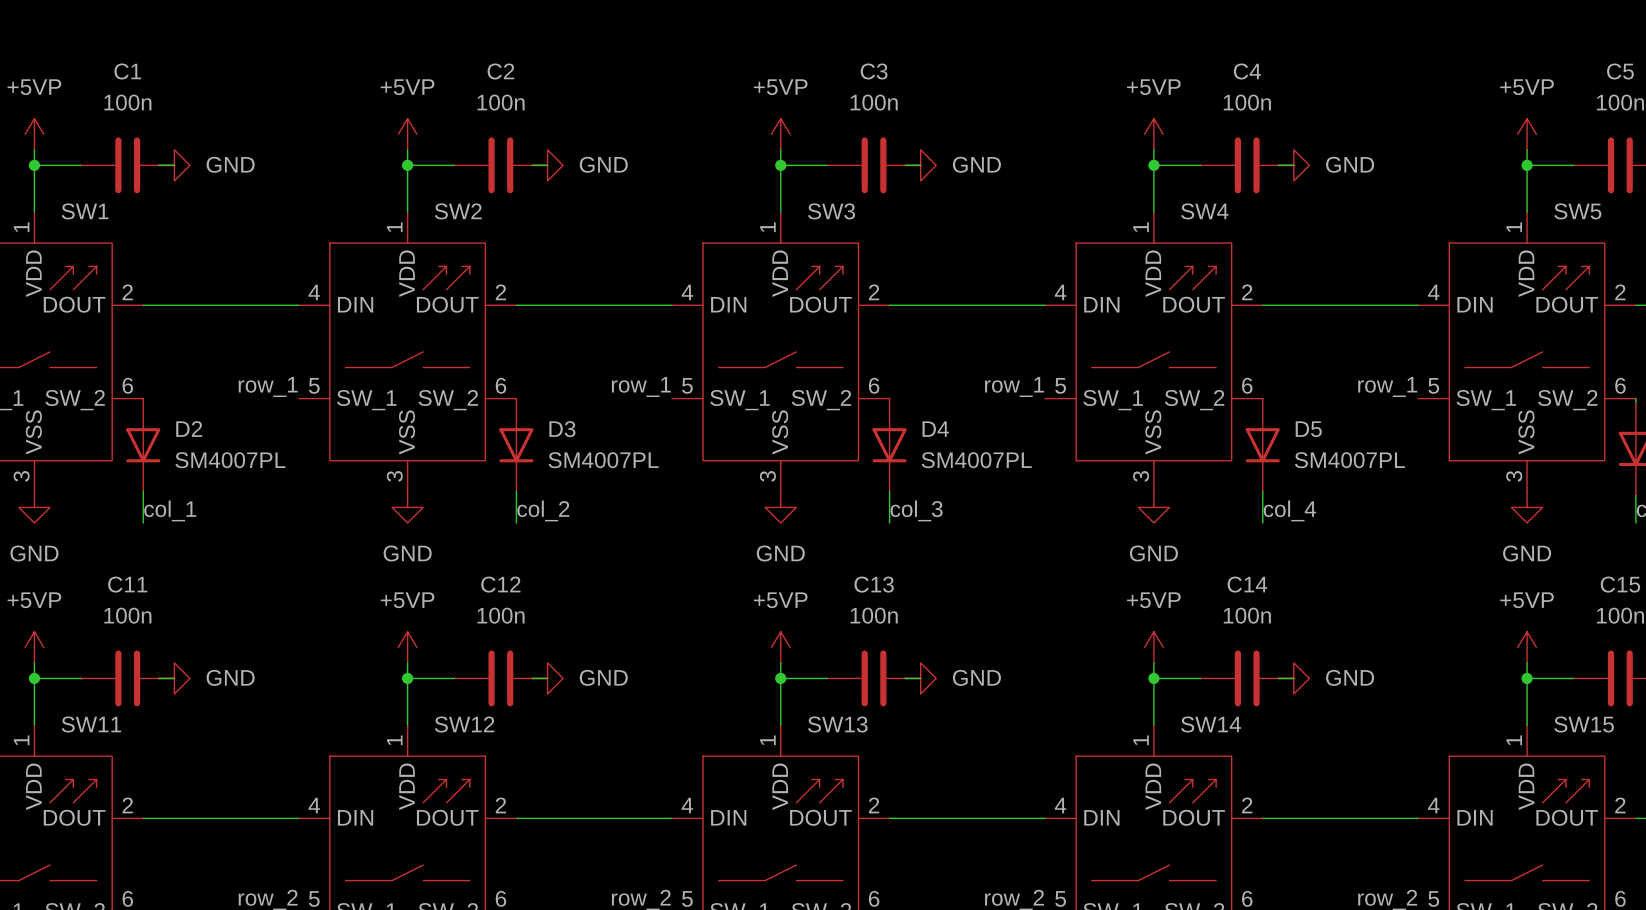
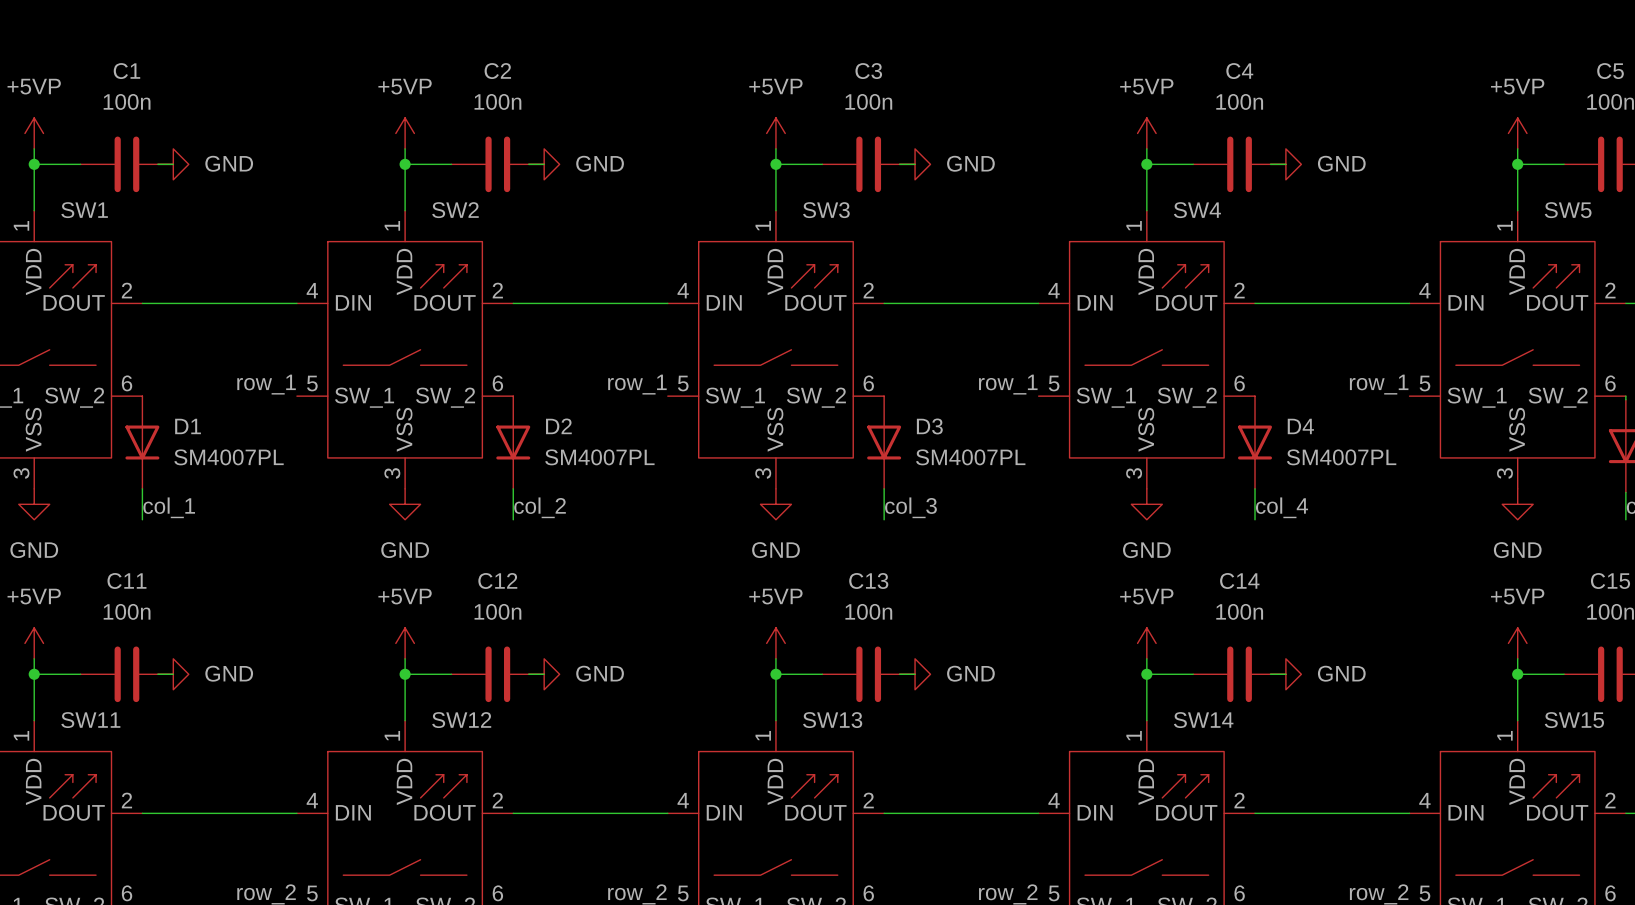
D2 name: D2 (189, 428) -> D1 (188, 426)
D3 name: D3 (562, 429) -> D2 (558, 426)
D4 name: D4 (935, 429) -> D3 (929, 426)
D5 name: D5 (1308, 429) -> D4 (1300, 426)

